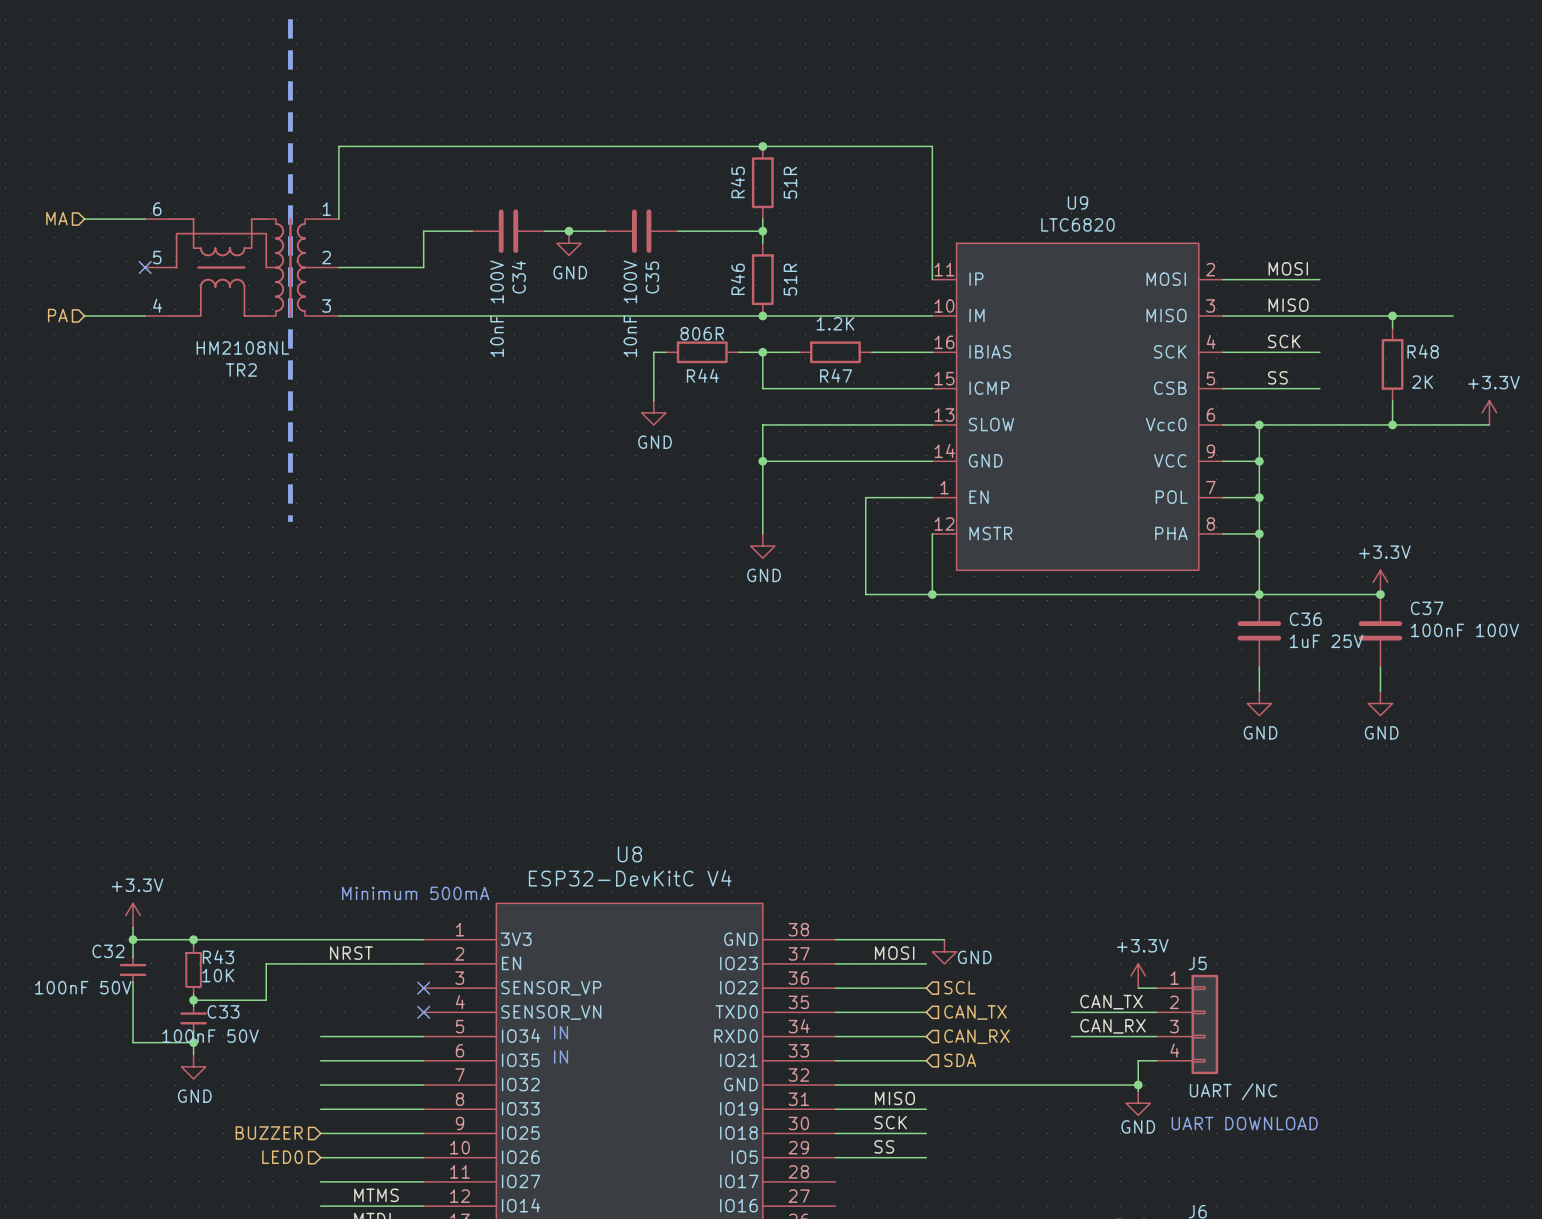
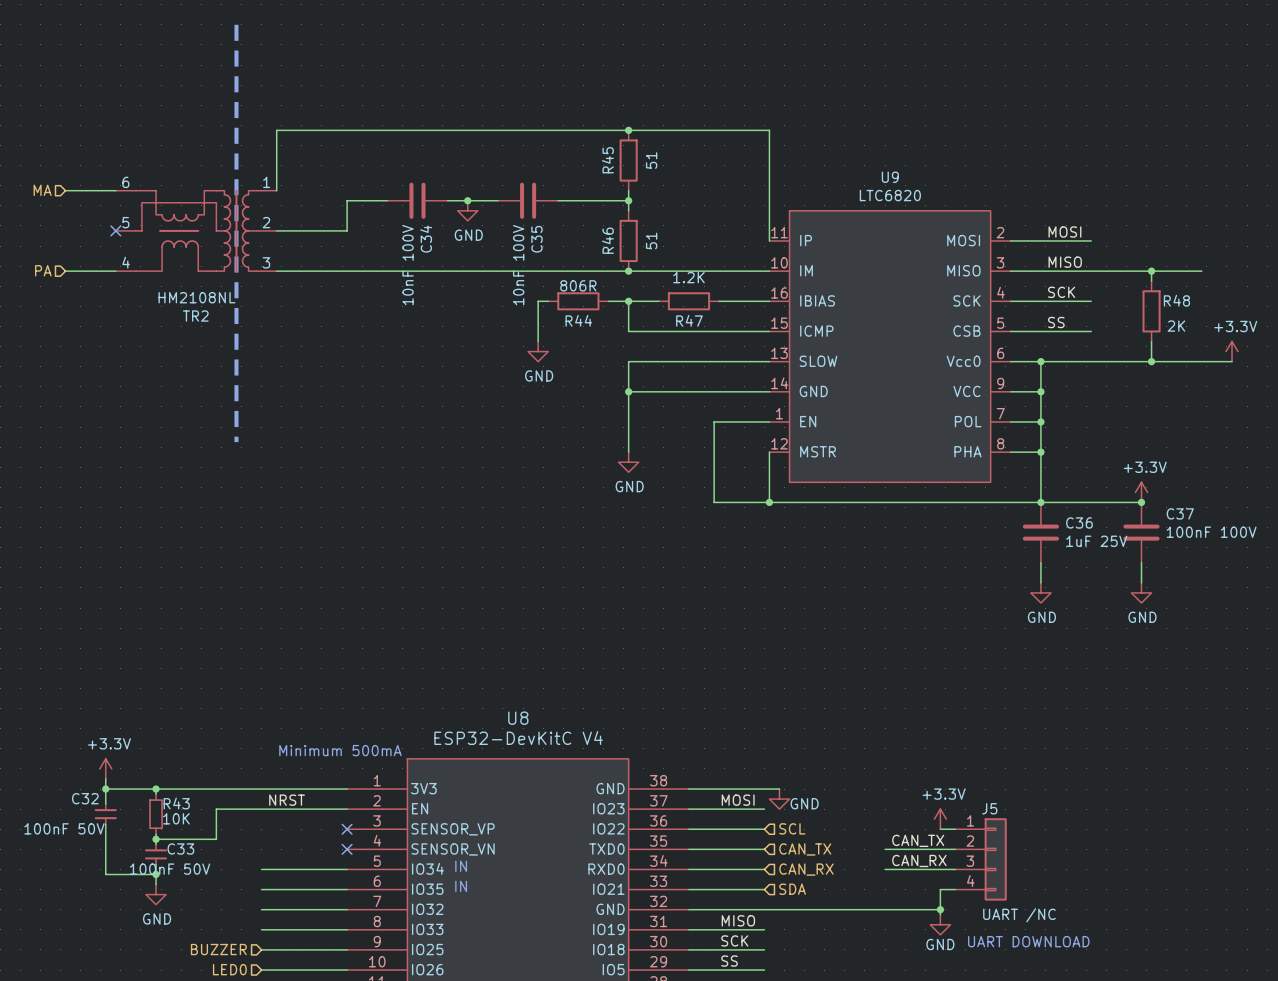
R45 value: 51R (790, 182) -> 51 (651, 160)
R46 value: 51R (790, 279) -> 51 (651, 240)

